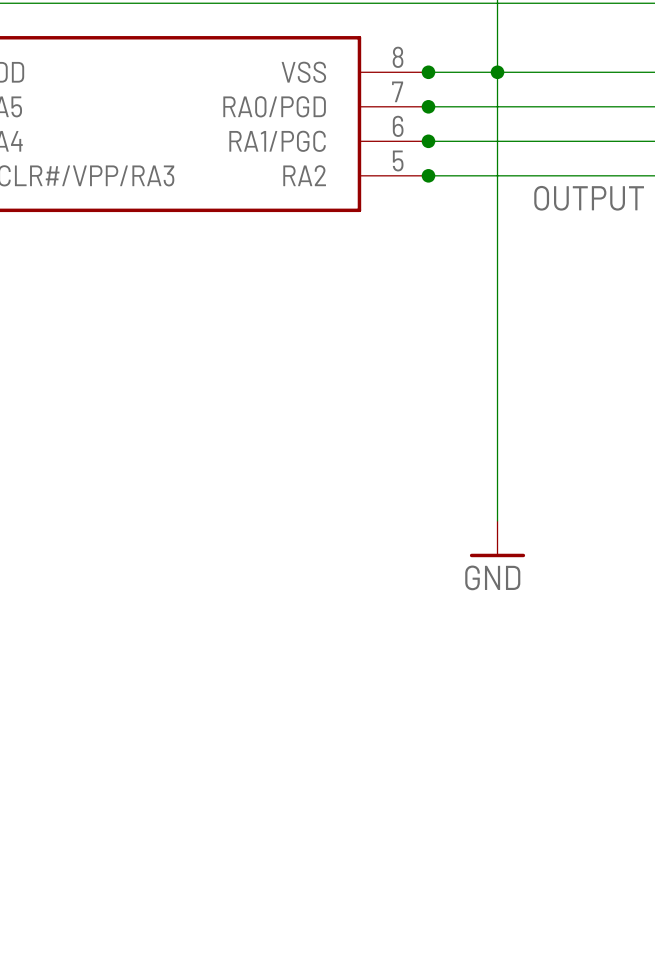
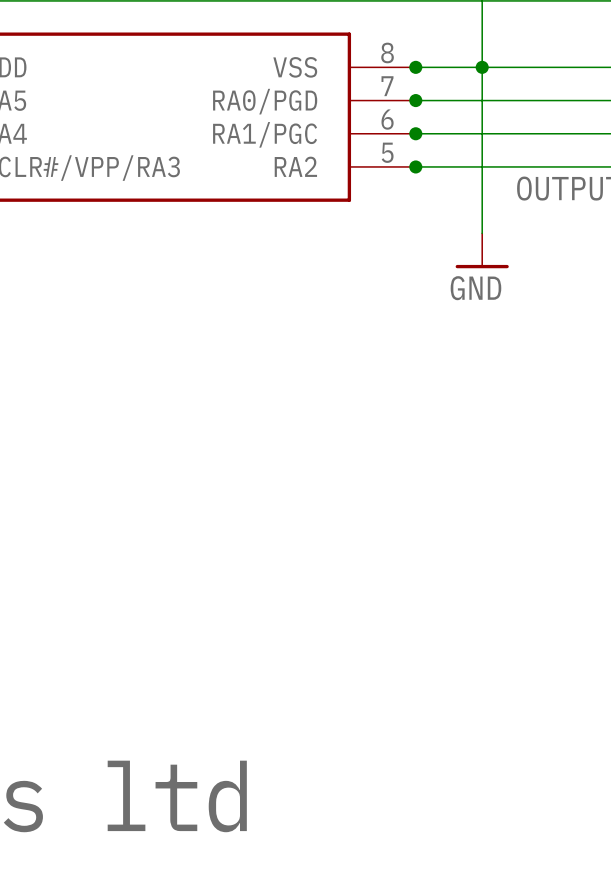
wire: (497, 244) (497, 520) -> none
power symbol: none -> GND (482, 250)
power symbol: GND (497, 539) -> none

